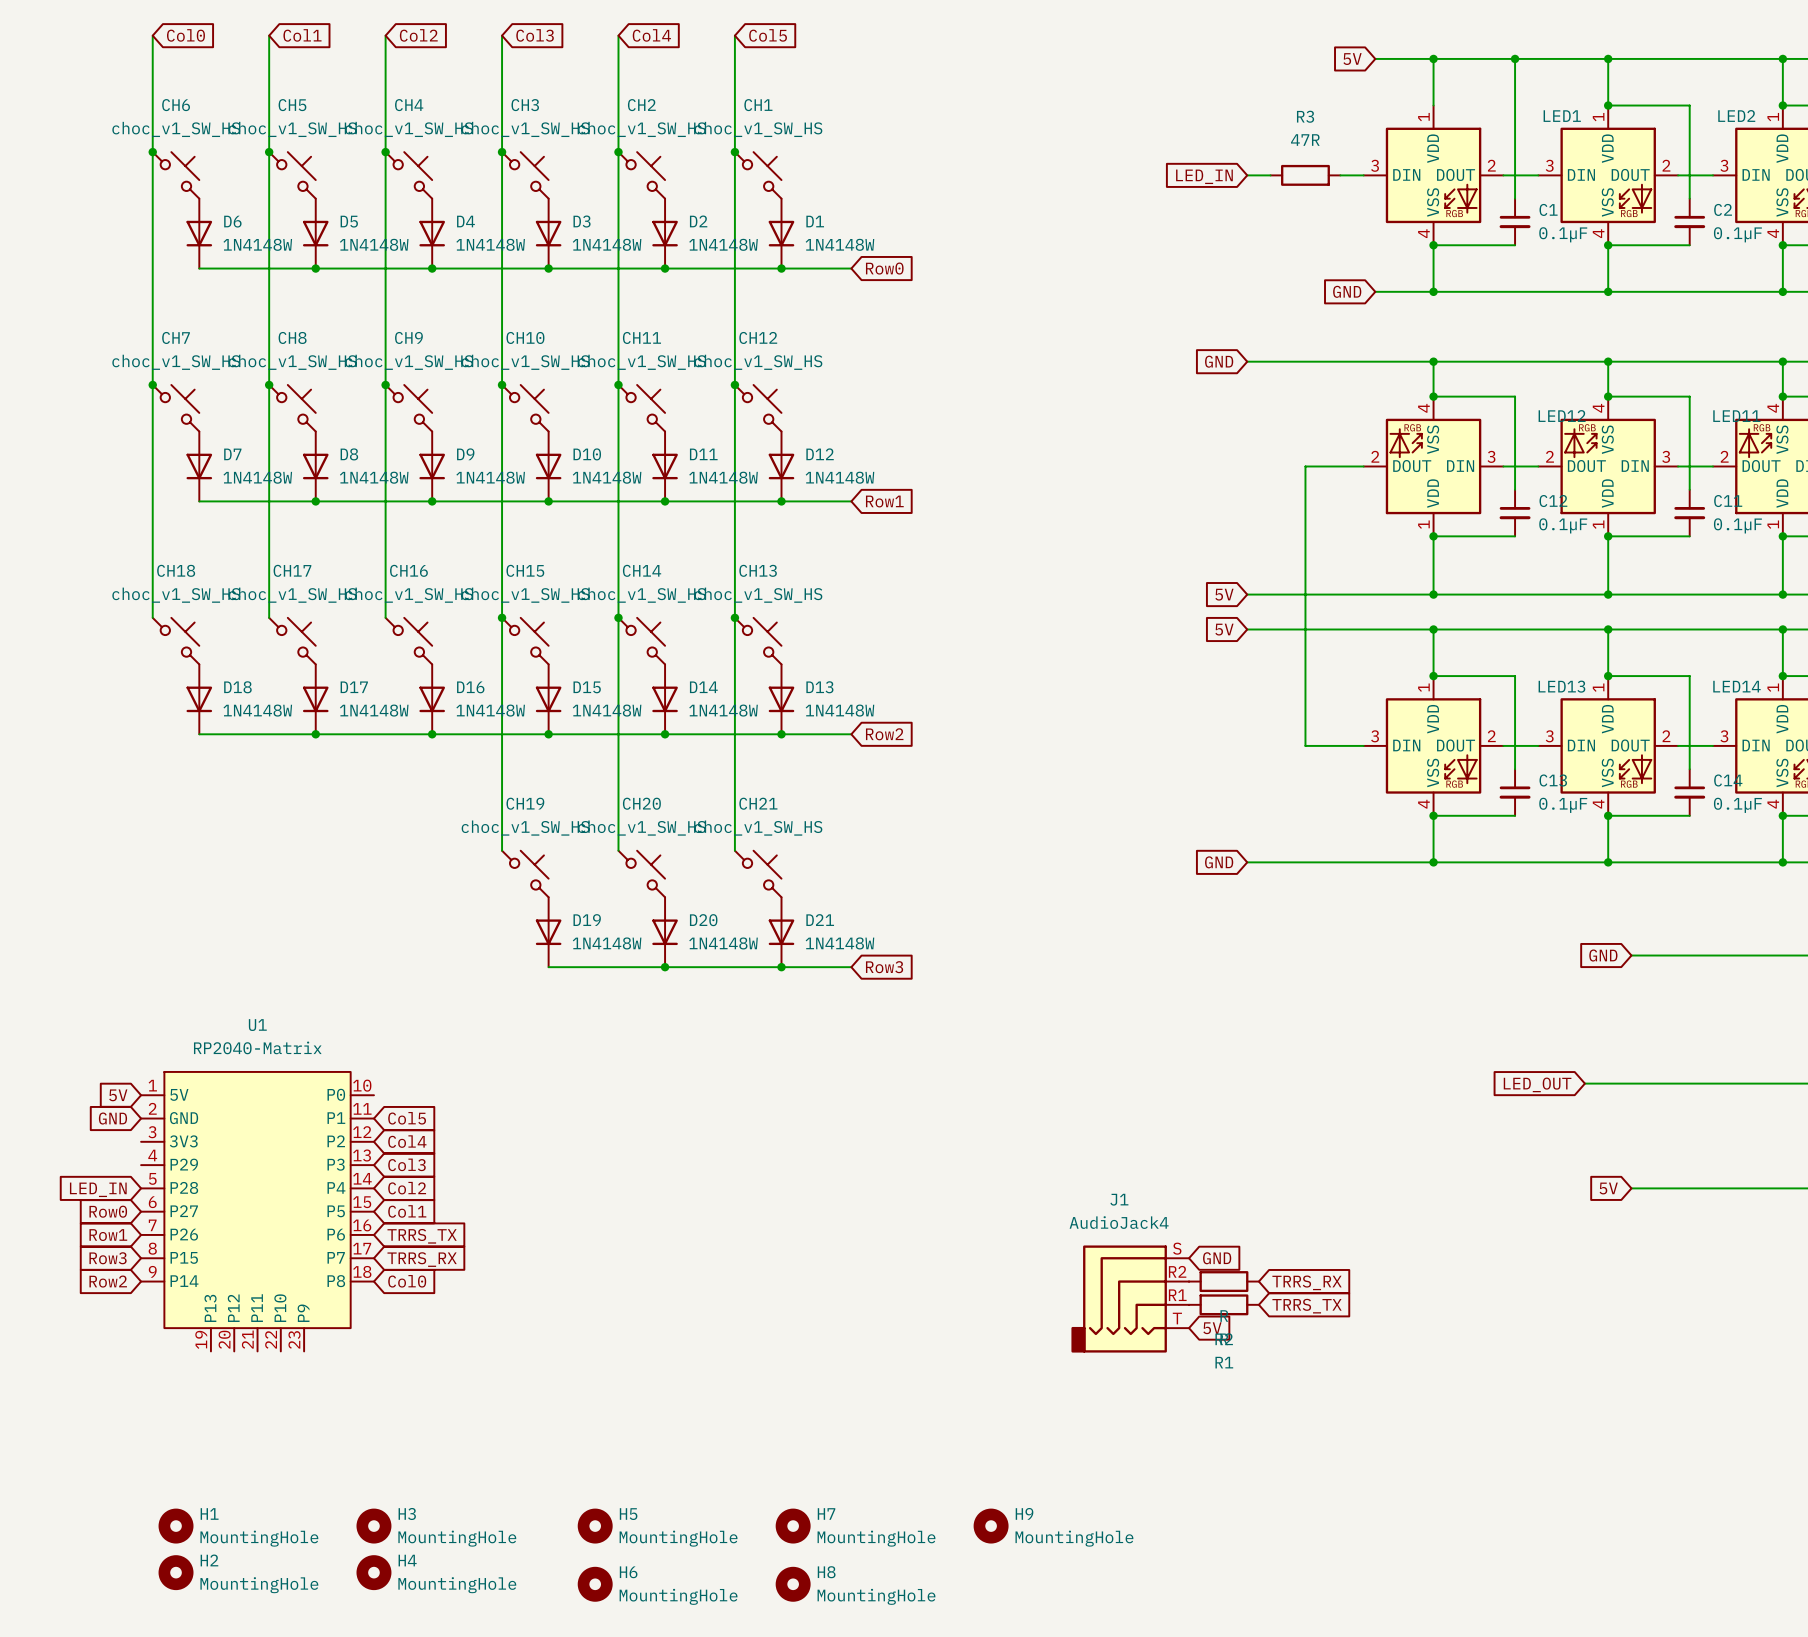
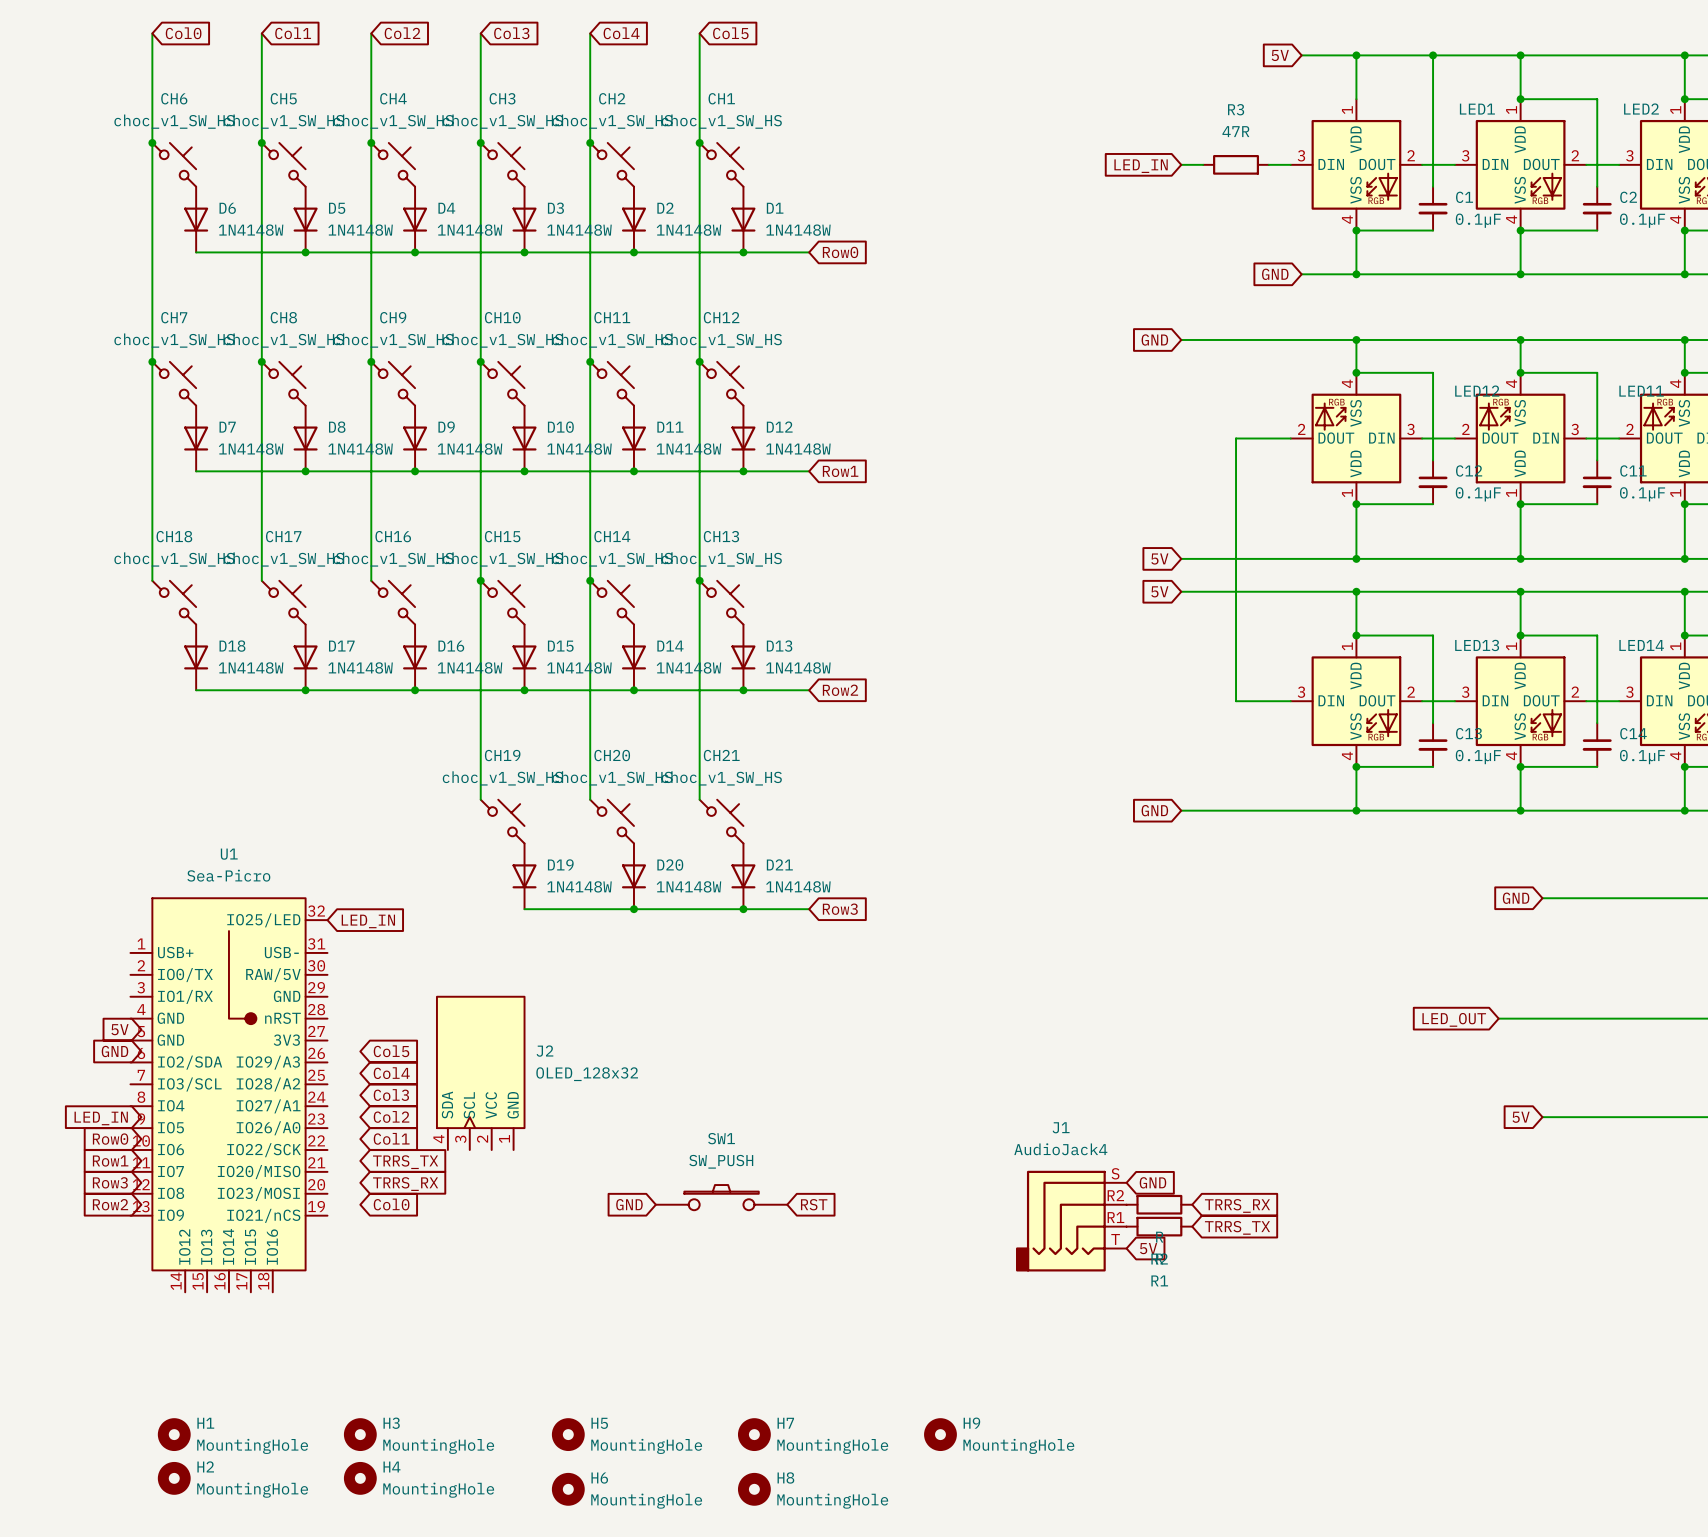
global label: none -> LED_IN (368, 921)
U1 name position: U1 (257, 1025) -> U1 (229, 854)
U1 value: RP2040-Matrix (257, 1047) -> Sea-Picro (228, 875)
U1 symbol: [141, 1071, 374, 1352] -> [130, 898, 328, 1293]
J2: none -> OLED_128x32 (480, 1073)
SW1: none -> SW_PUSH (721, 1197)
global label: none -> GND (629, 1204)
global label: none -> RST (814, 1204)

